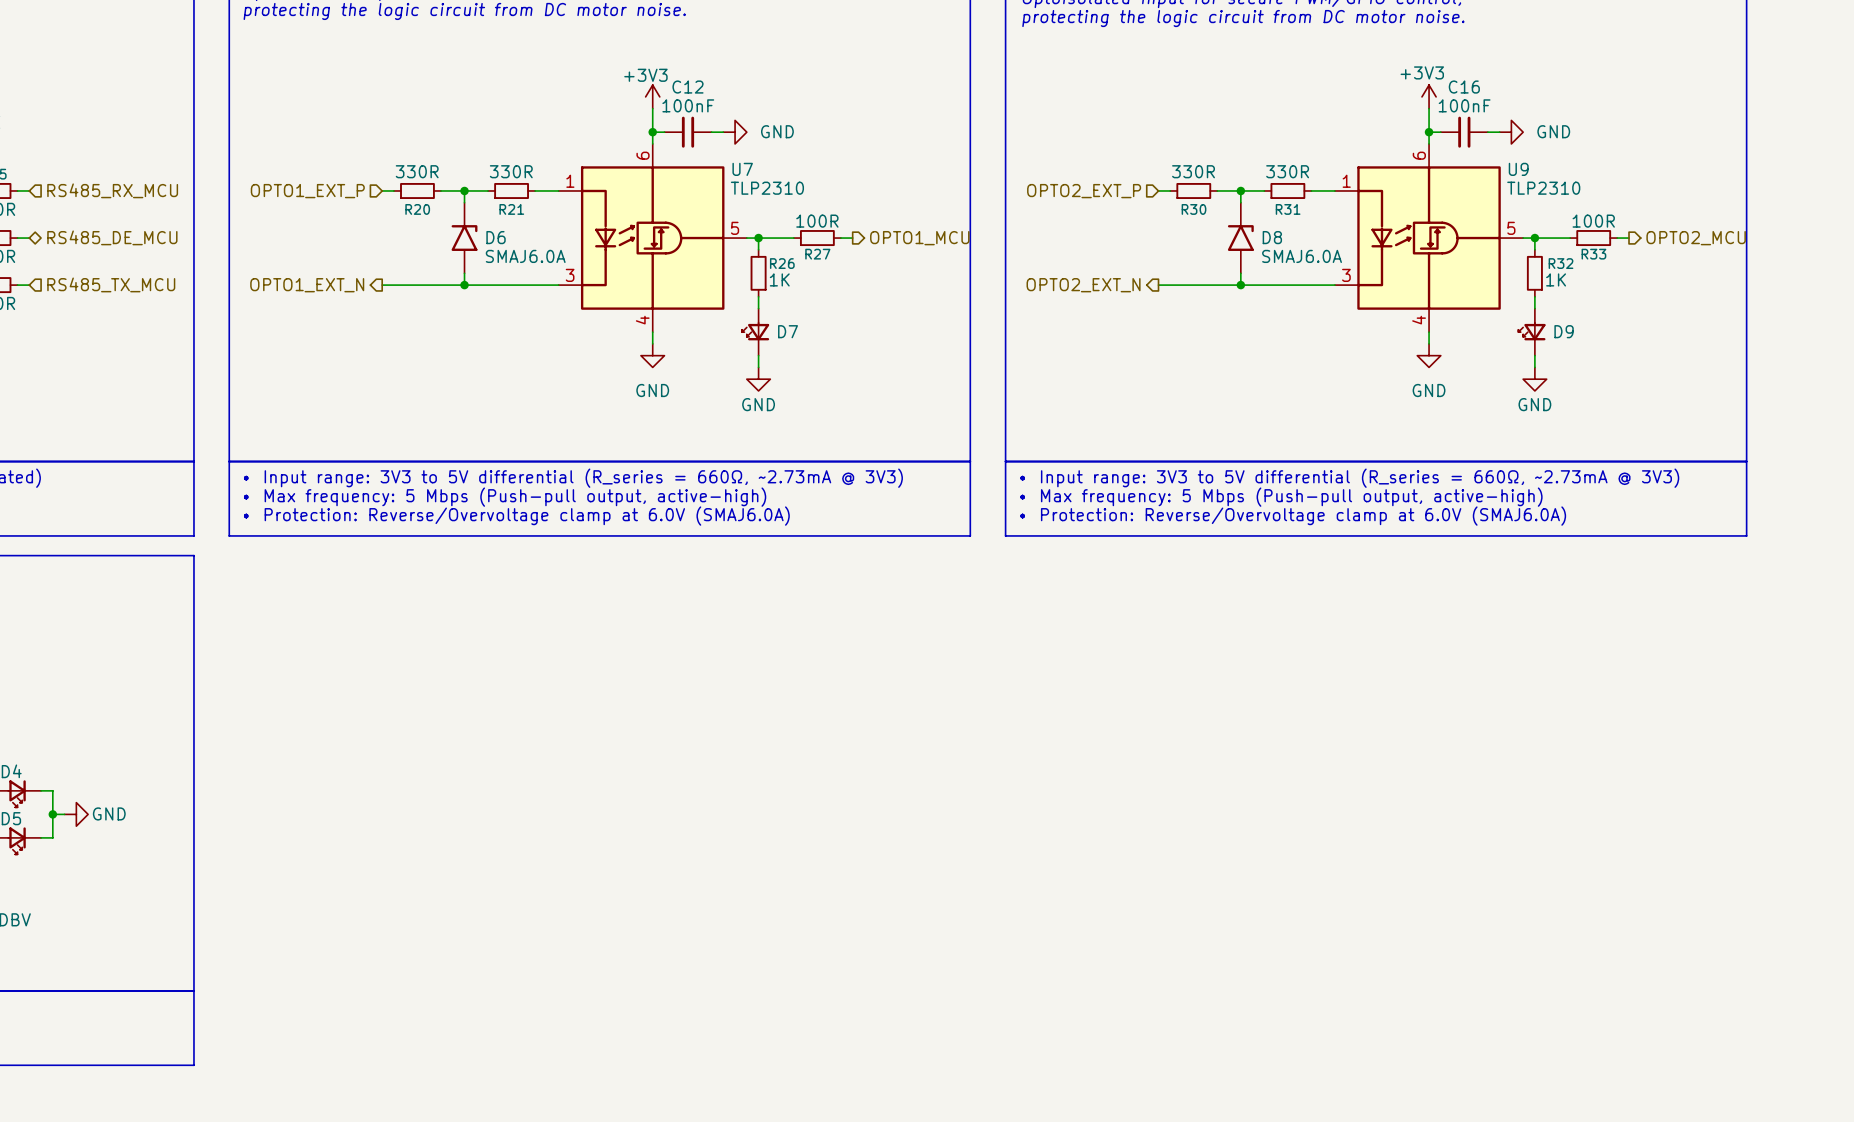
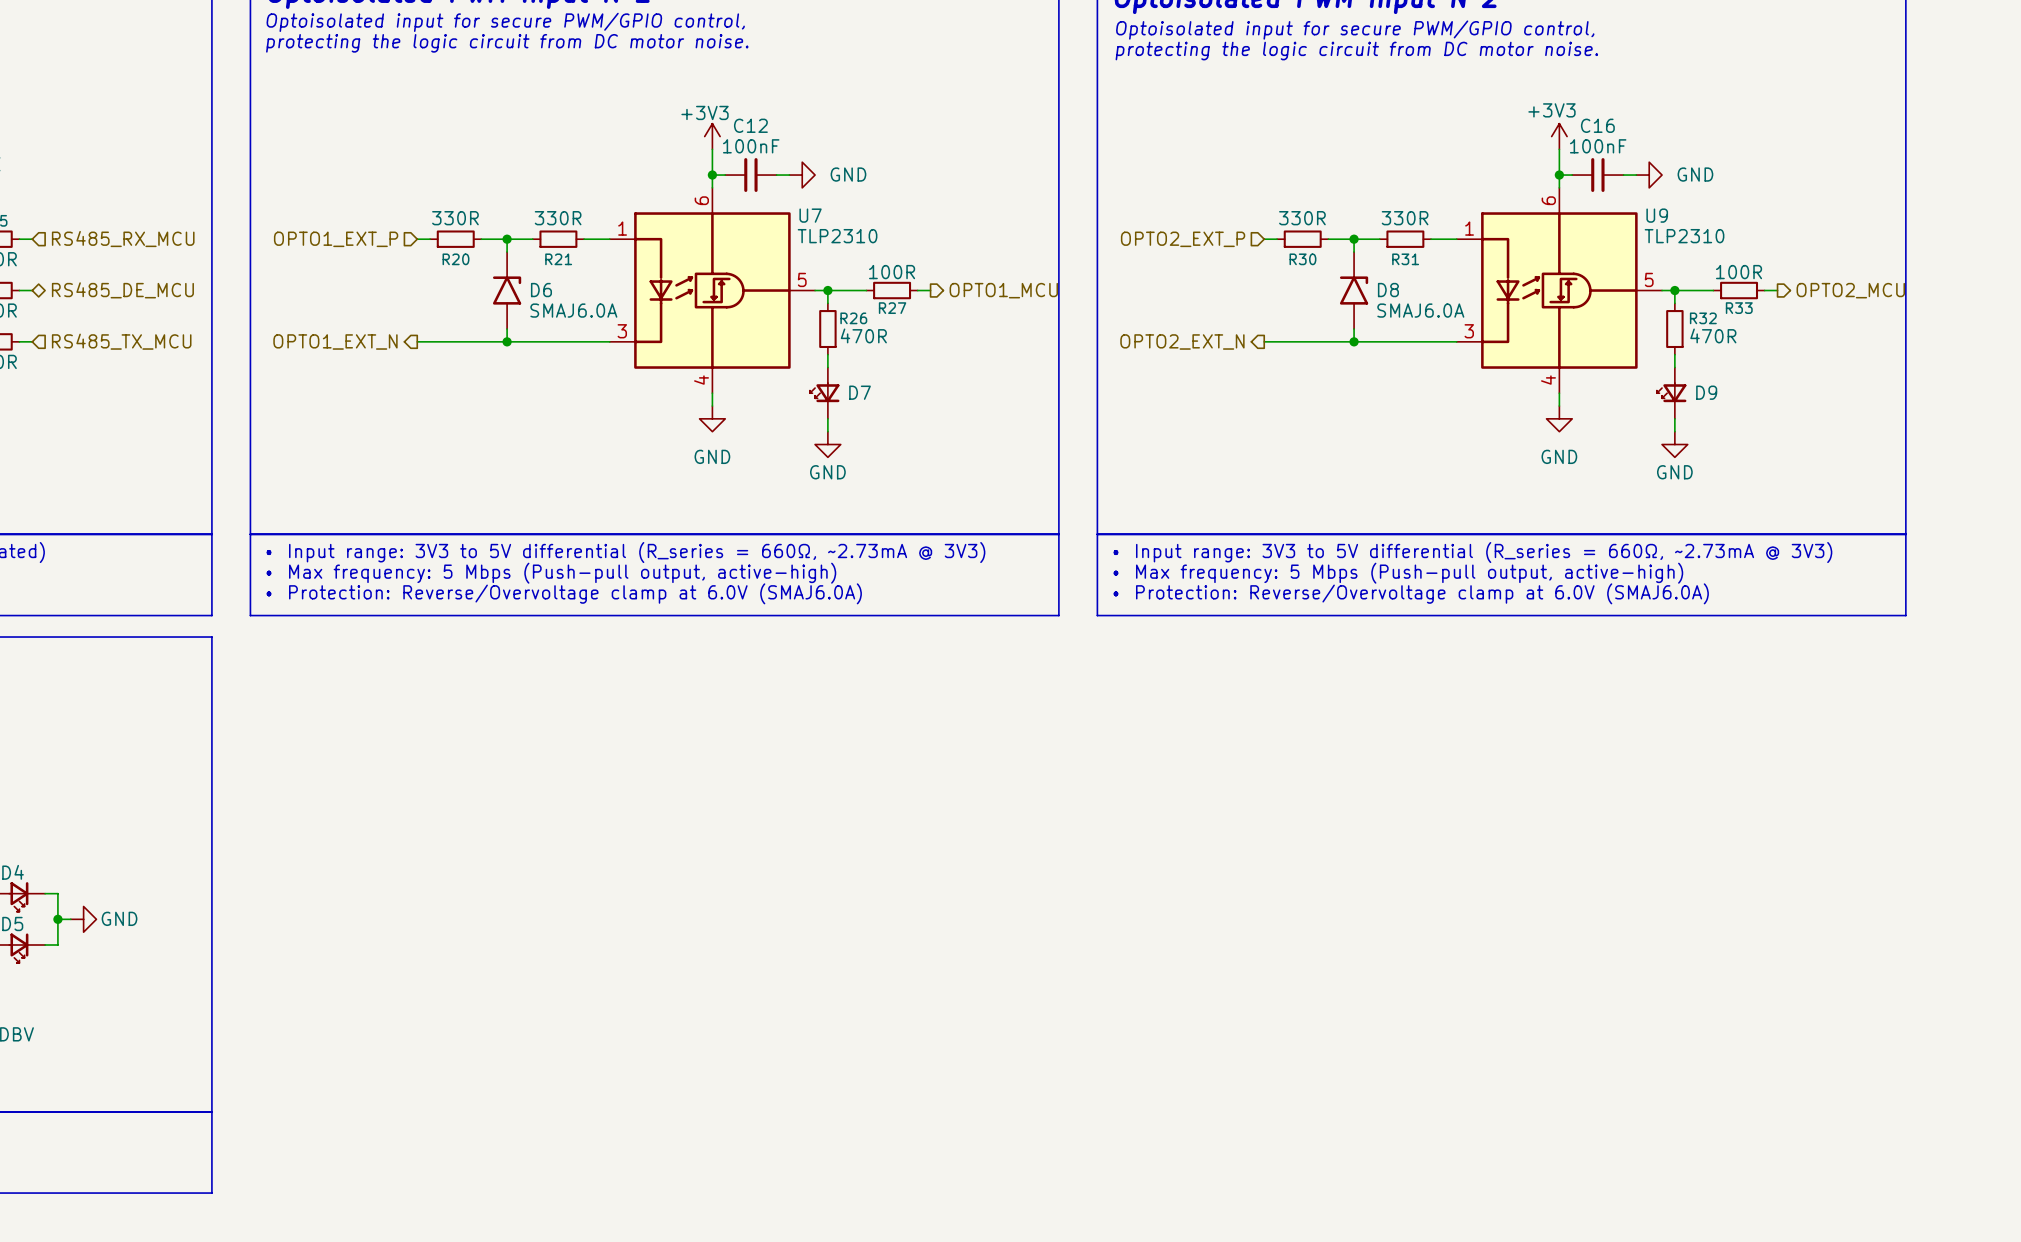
R26 value: 1K (779, 279) -> 470R (863, 335)
R32 value: 1K (1556, 279) -> 470R (1713, 335)

